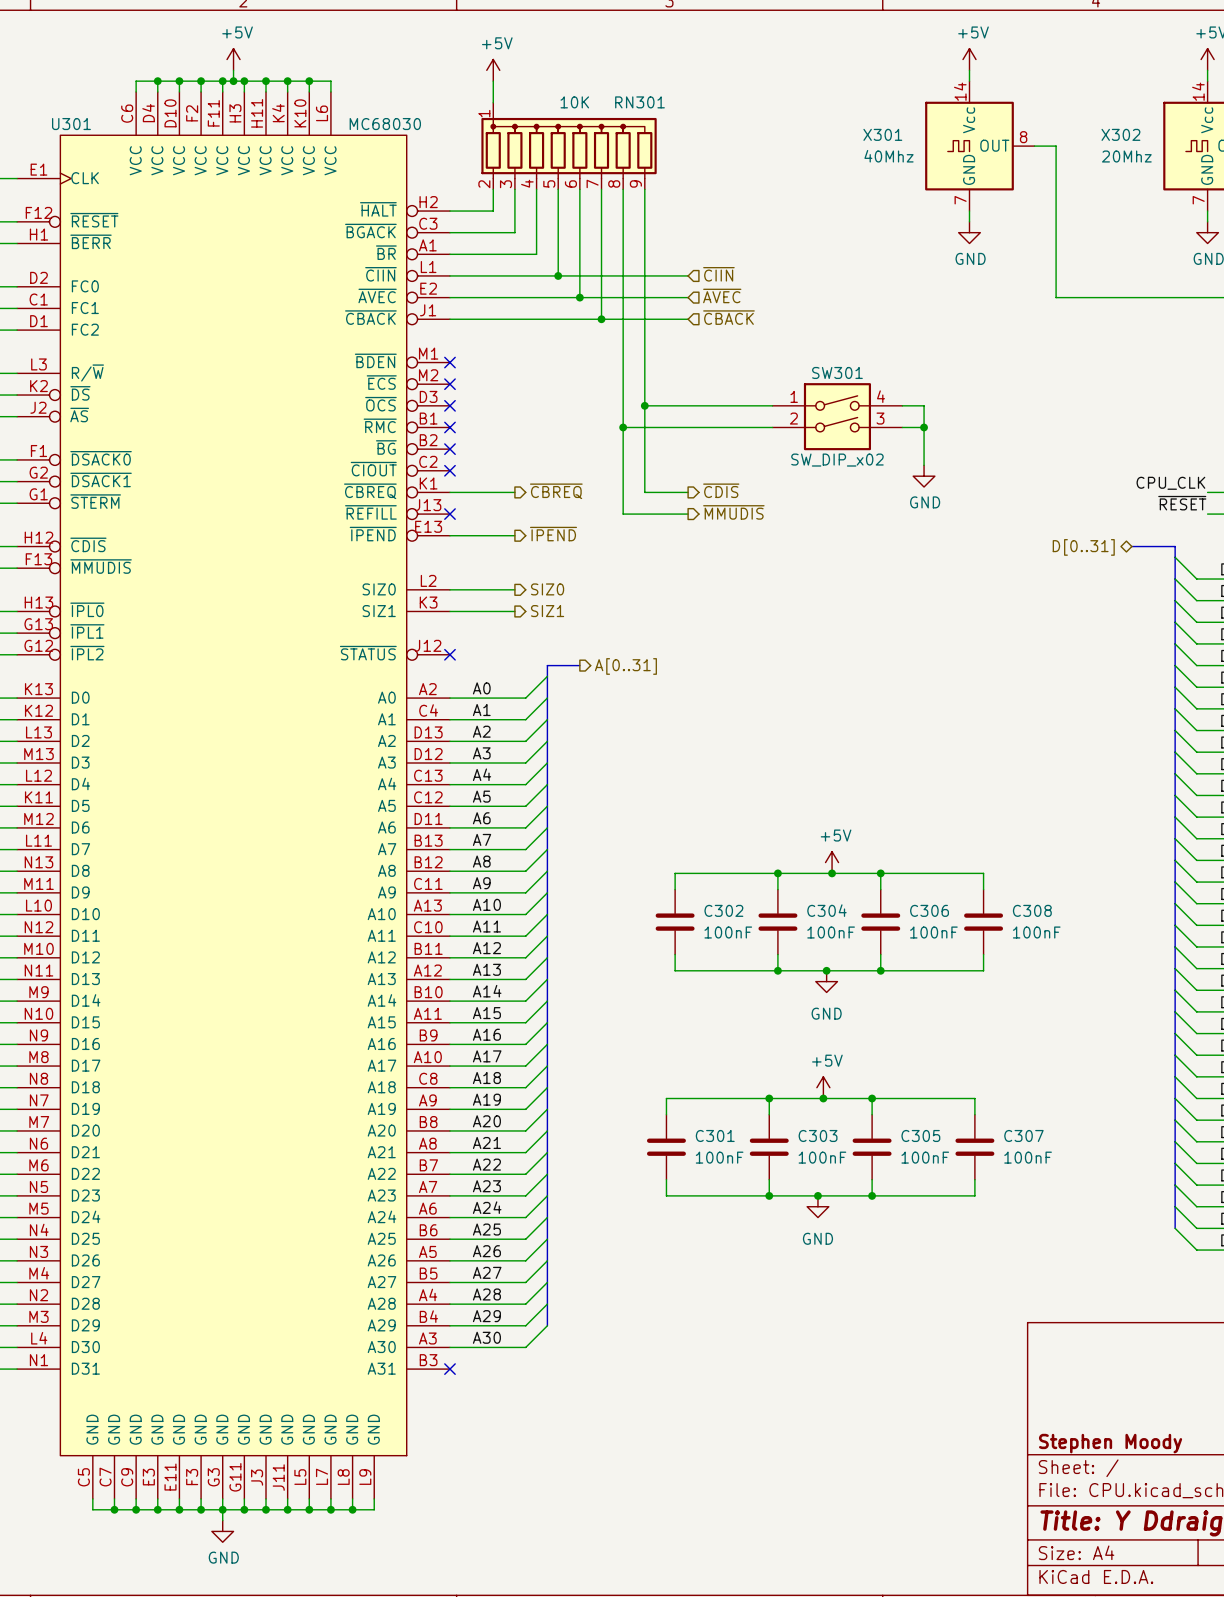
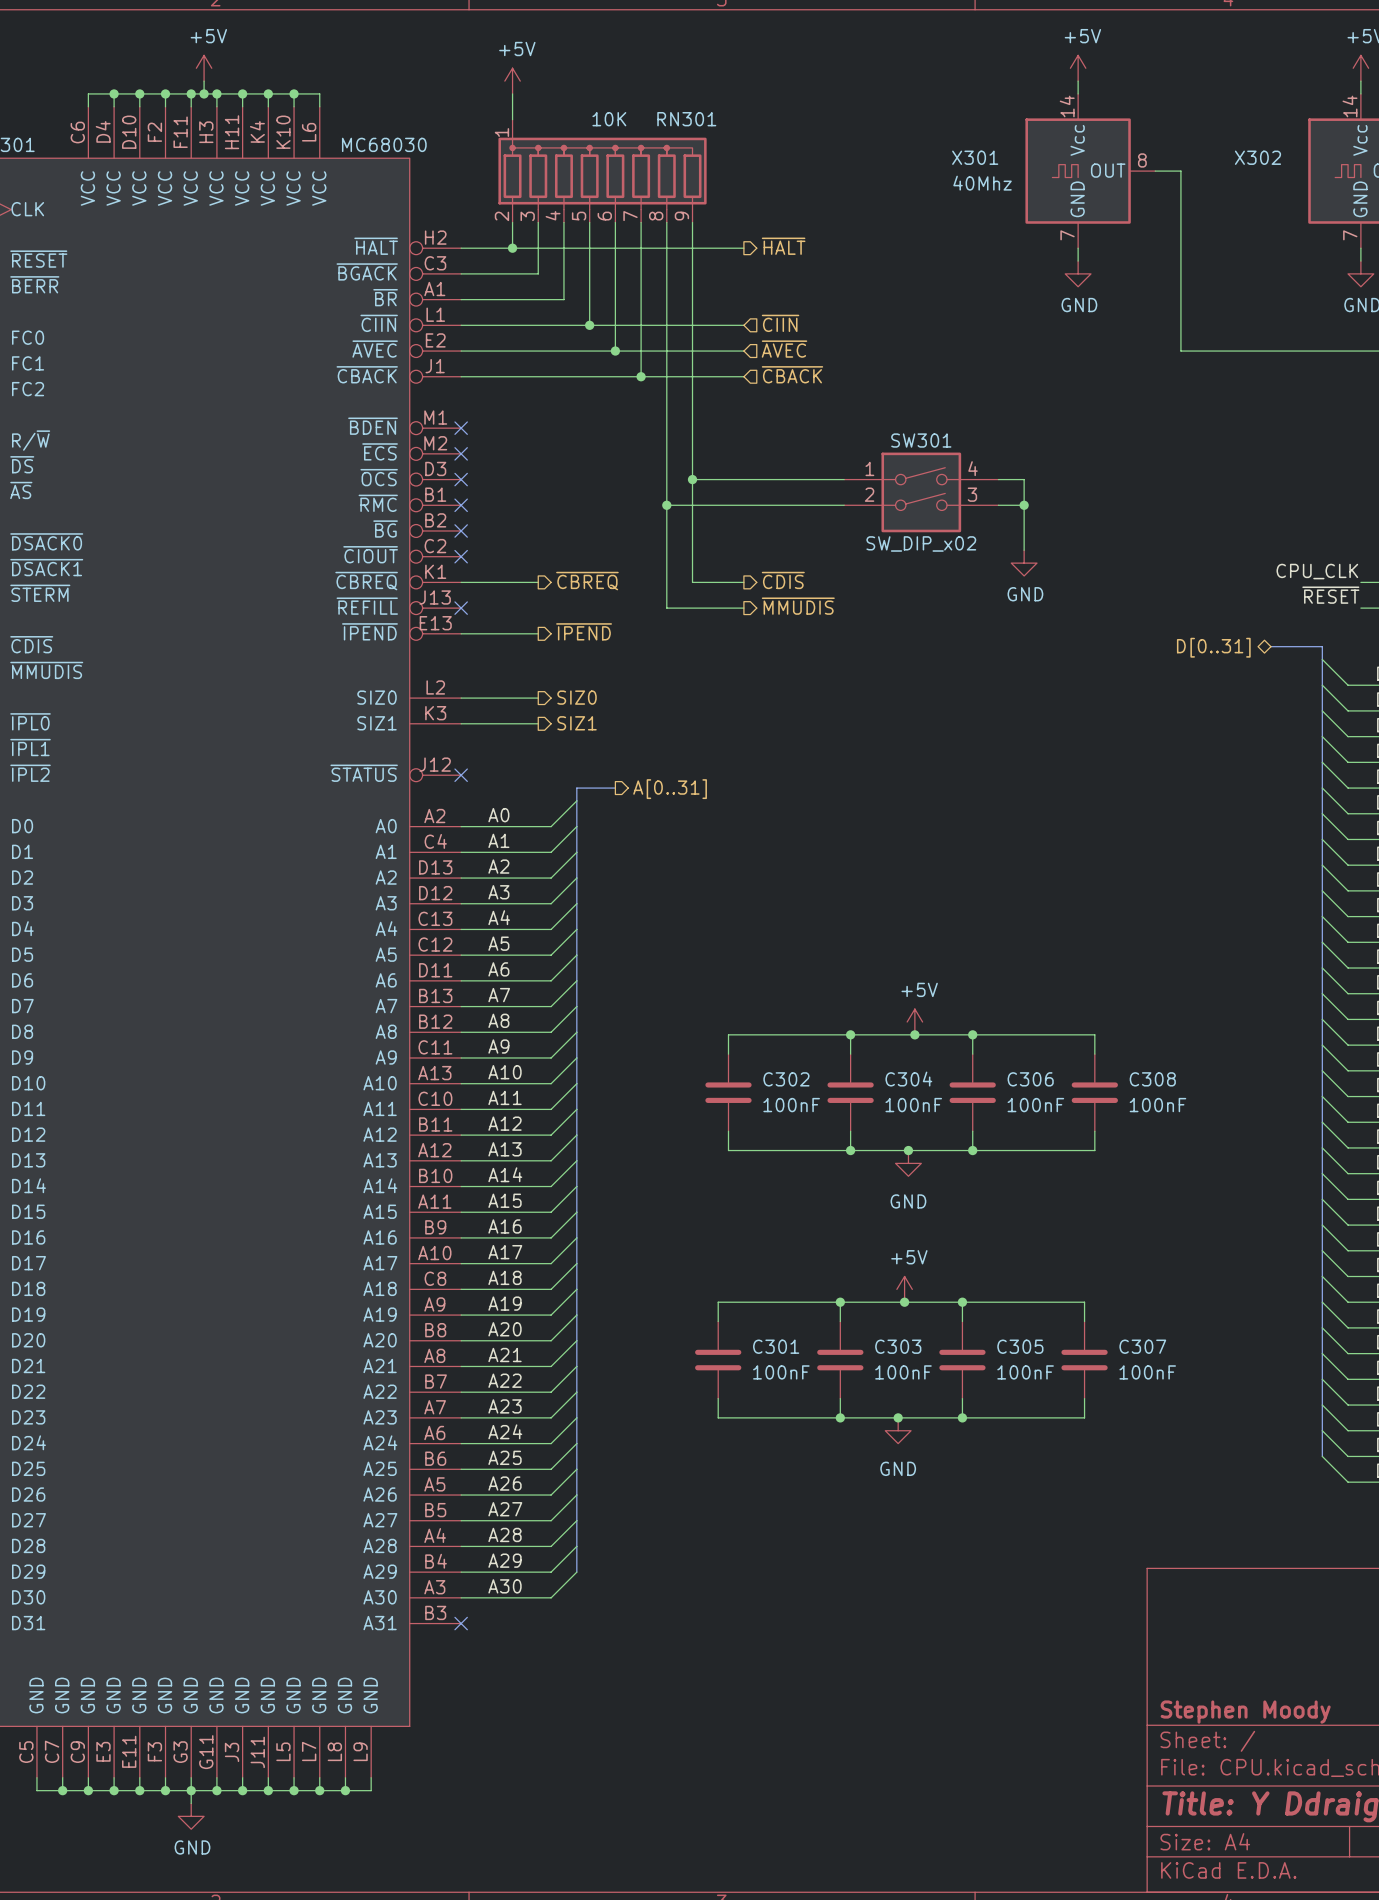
X302 value: 20Mhz (1126, 156) -> none
hierarchical label: none -> ~{HALT} (783, 246)
wire: none -> (512, 248) (743, 248)
junction: none -> (512, 248)

